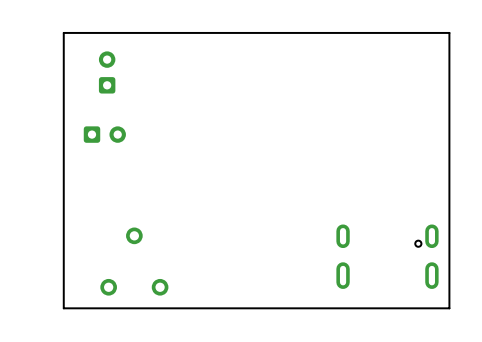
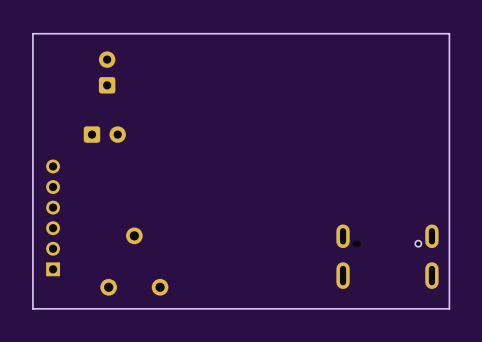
board edge: (449, 33) (63, 32) (63, 308) (449, 308) -> (449, 33) (32, 33) (32, 308) (449, 308)
part: none -> (53, 217)

